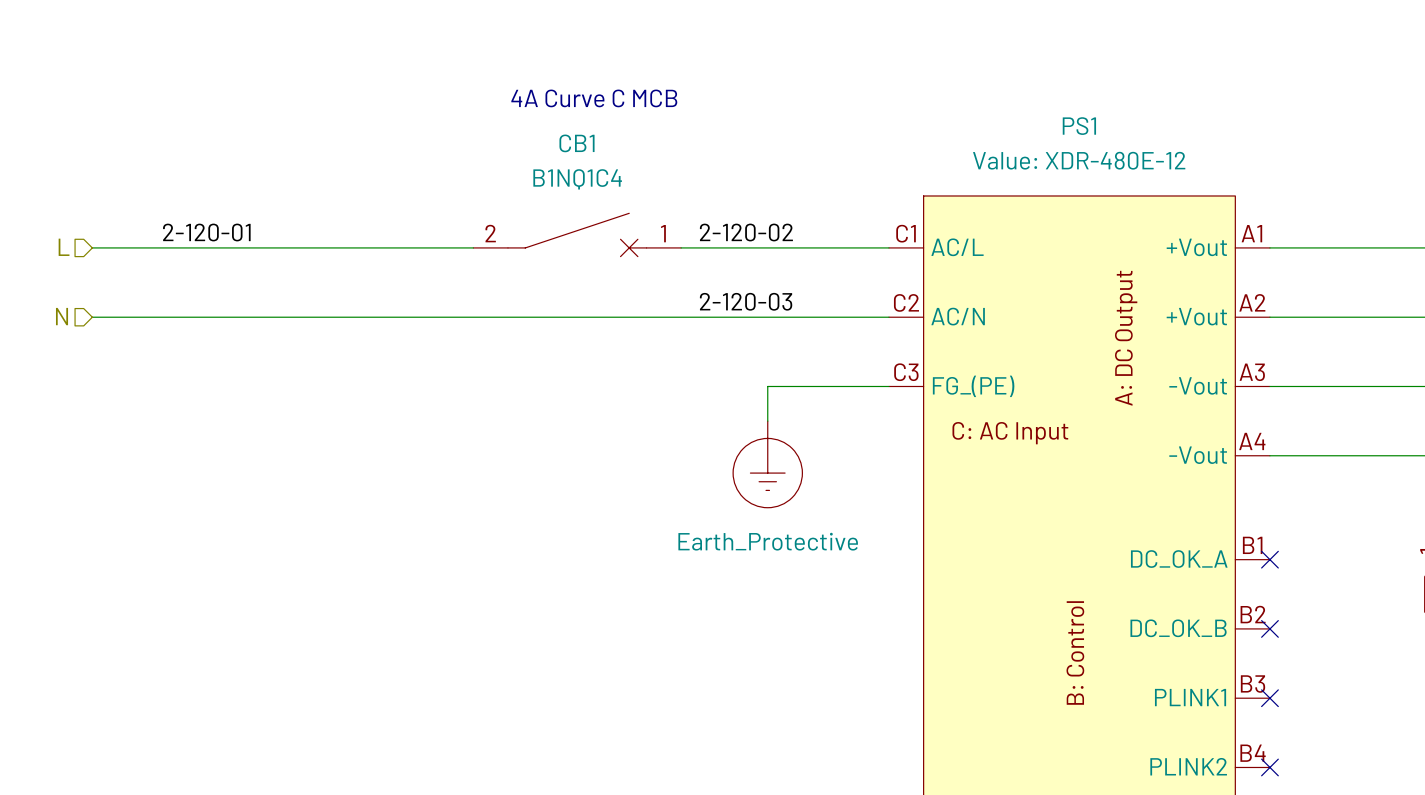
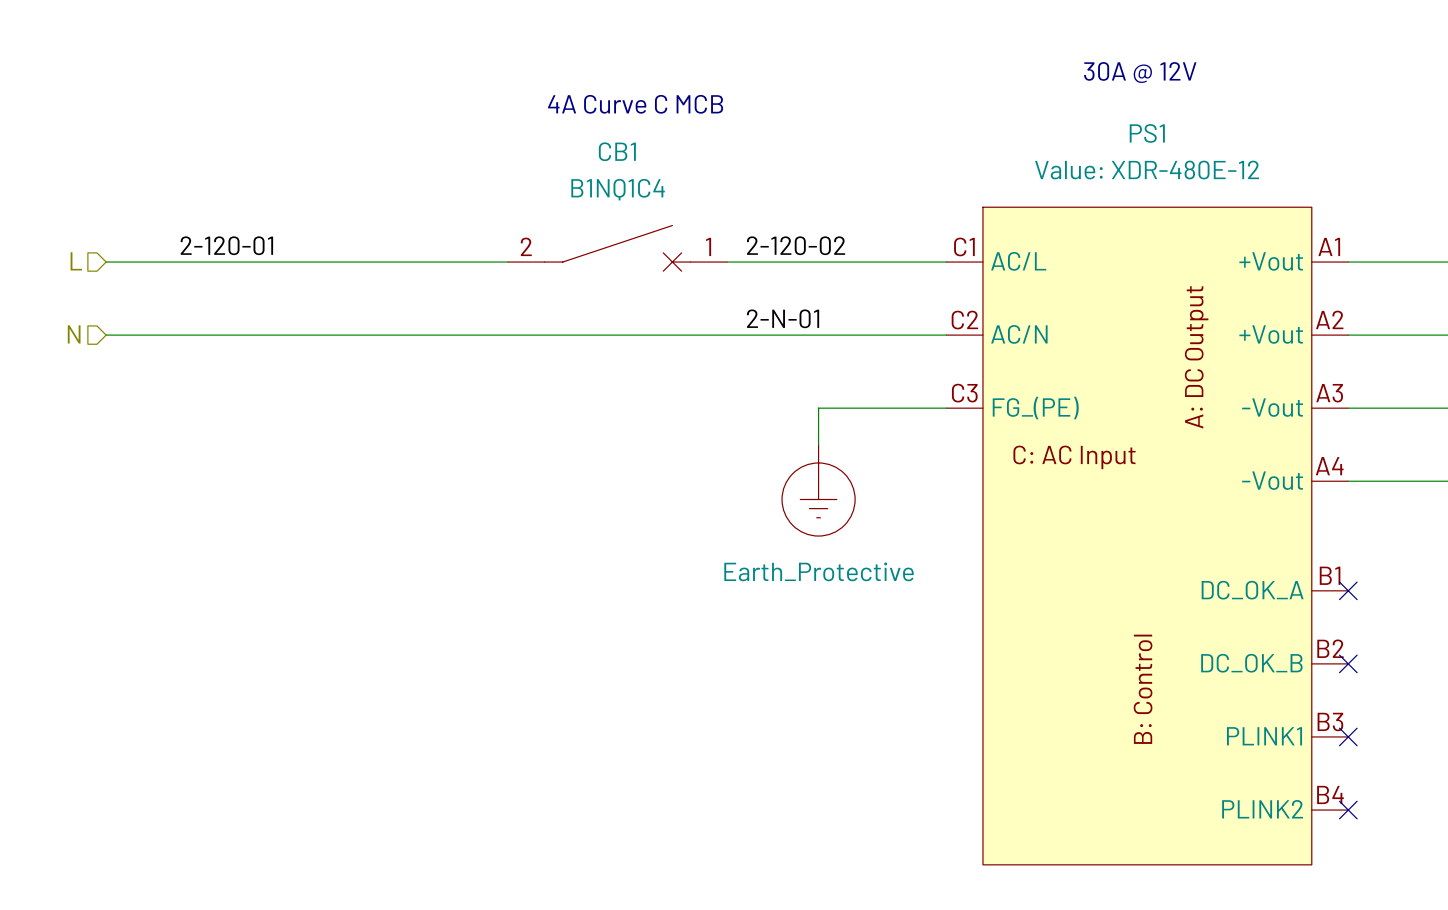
text: none -> 30A @ 12V (1140, 72)
label: 2-120-03 (746, 301) -> 2-N-01 (783, 318)

